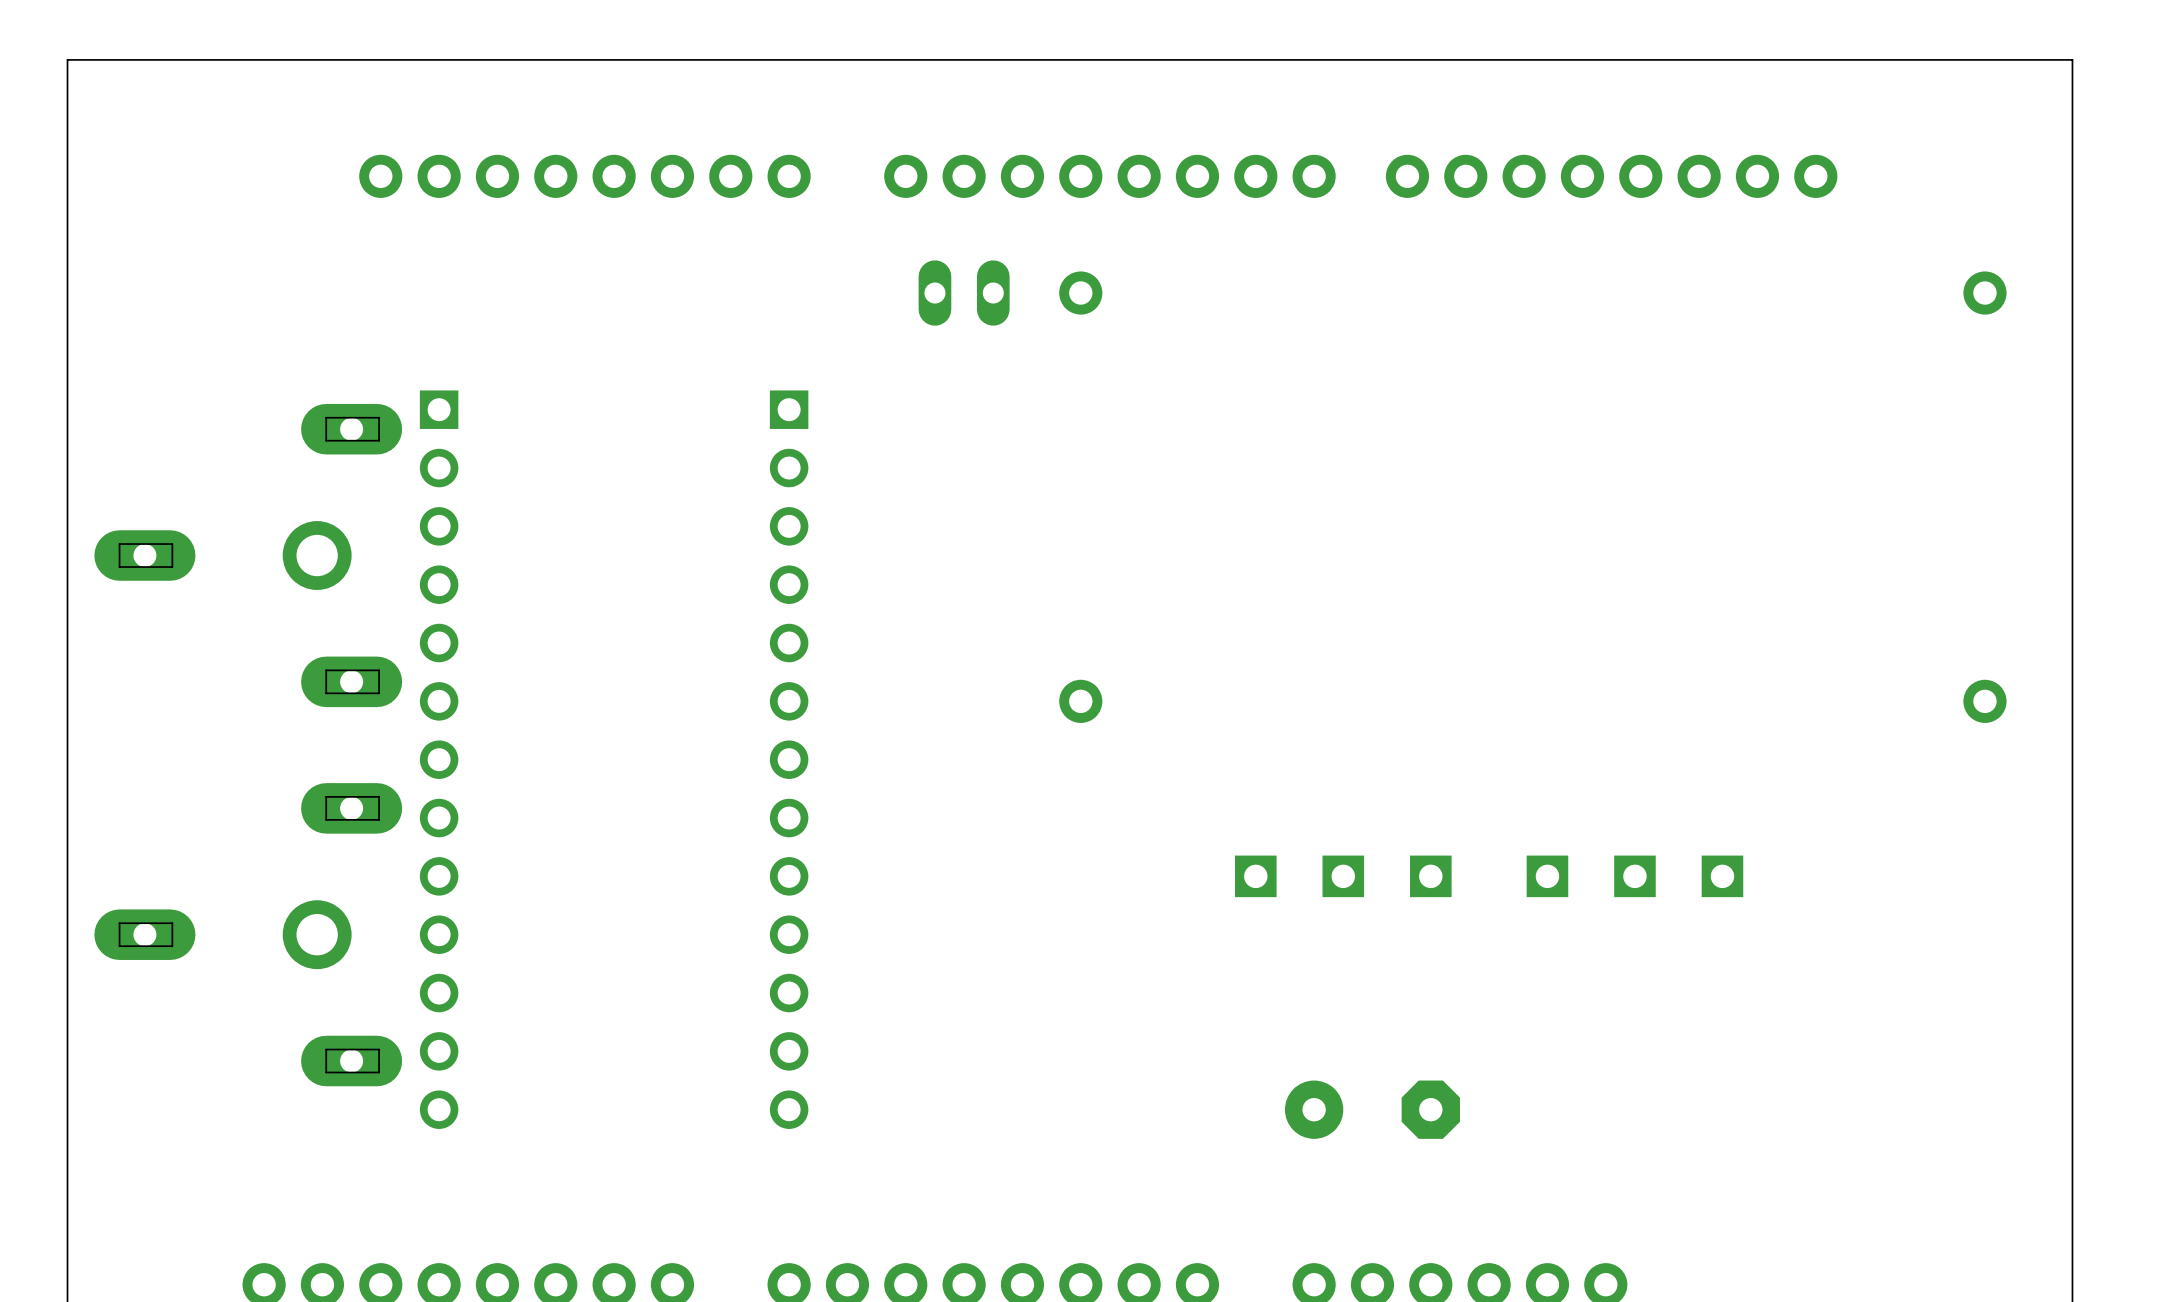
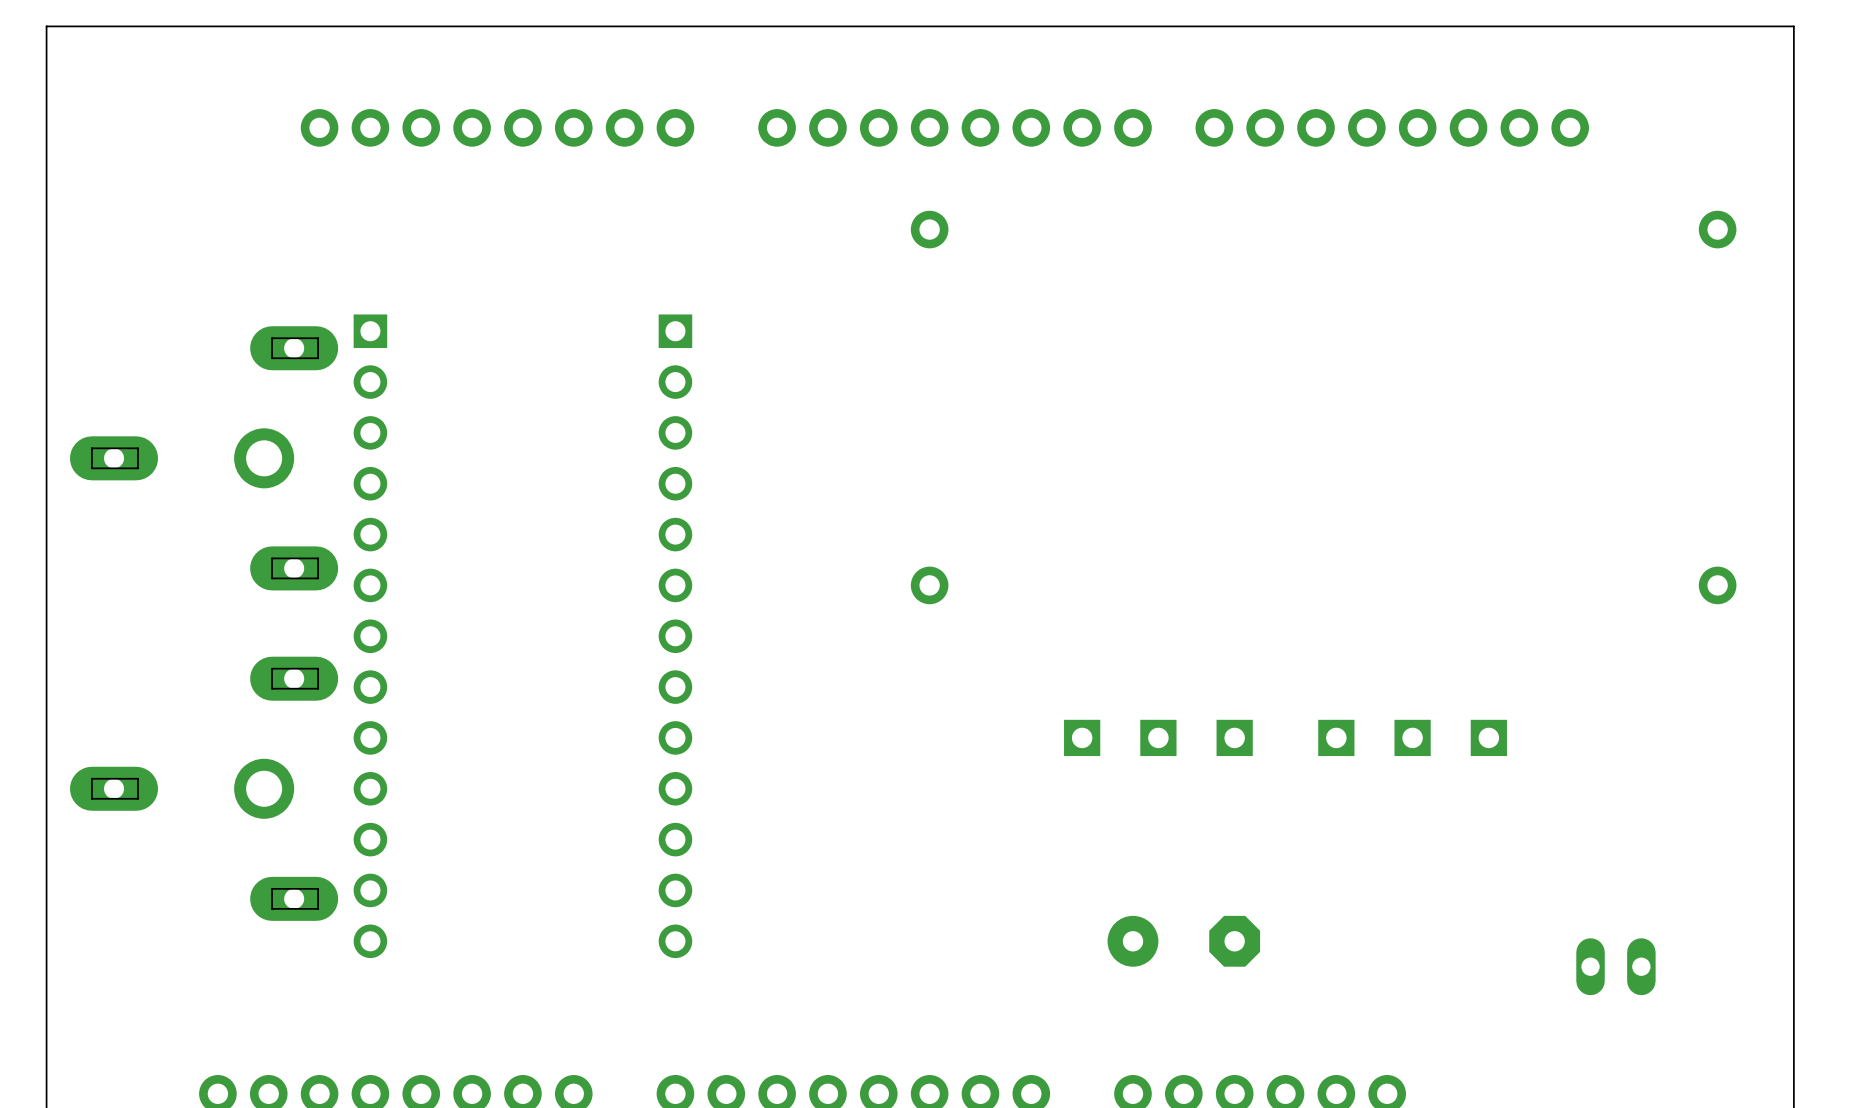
part: (964, 293) -> none
part: none -> (1615, 966)

